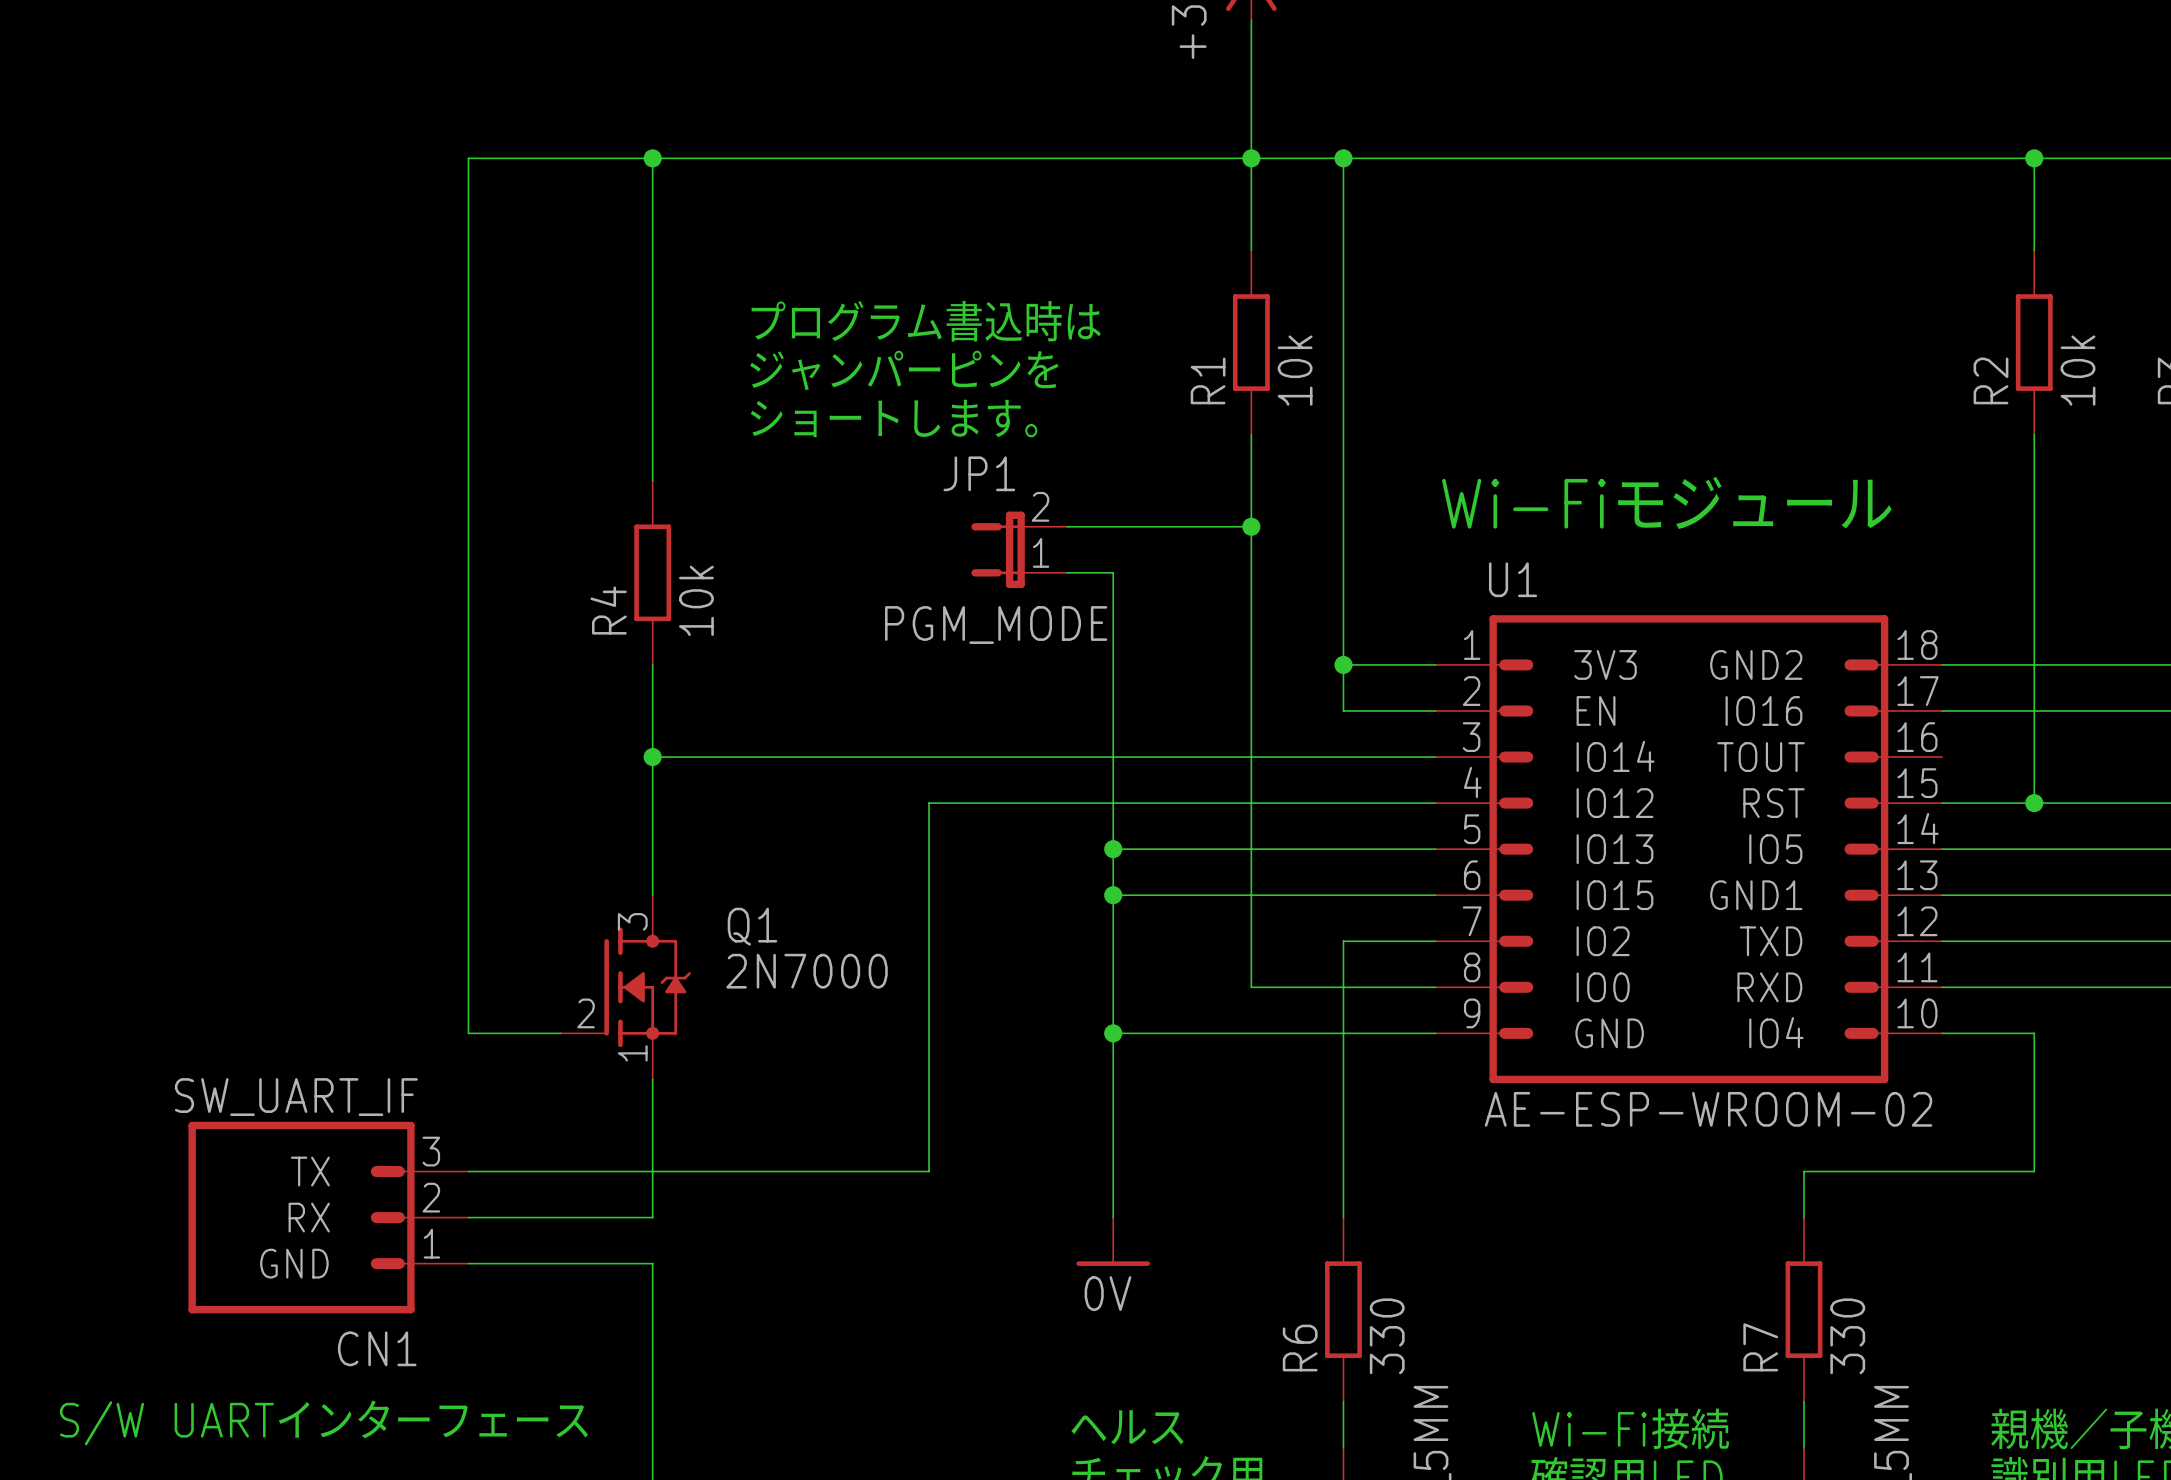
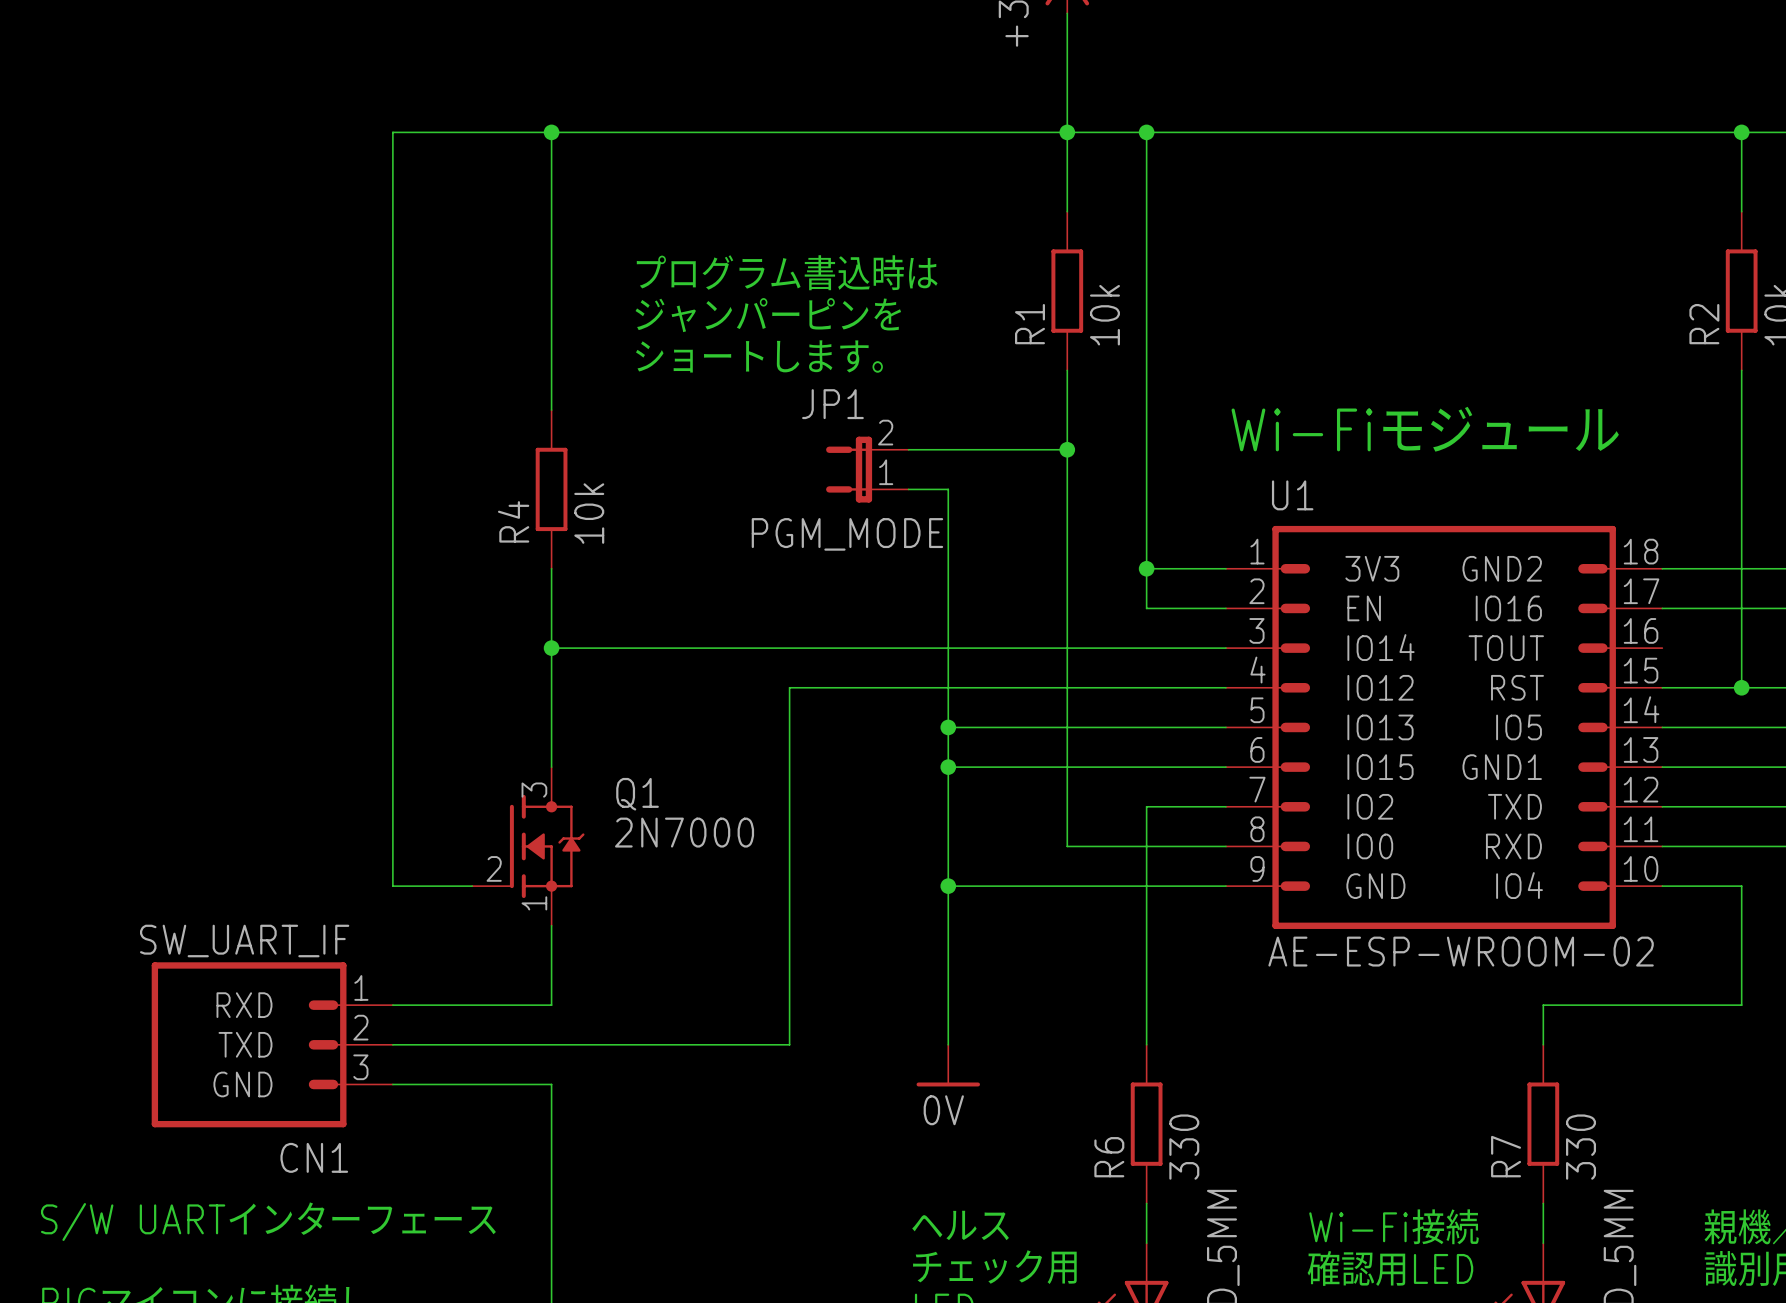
CN1 pin number: 3 (431, 1151) -> 1 (361, 987)
CN1 pin name: TX (310, 1171) -> RXD (244, 1005)
wire: (929, 1171) (652, 1171) (652, 1217) -> (789, 1005) (789, 1044) (551, 1044)
CN1 pin name: RX (309, 1217) -> TXD (245, 1044)
CN1 pin number: 1 (431, 1243) -> 3 (360, 1067)

